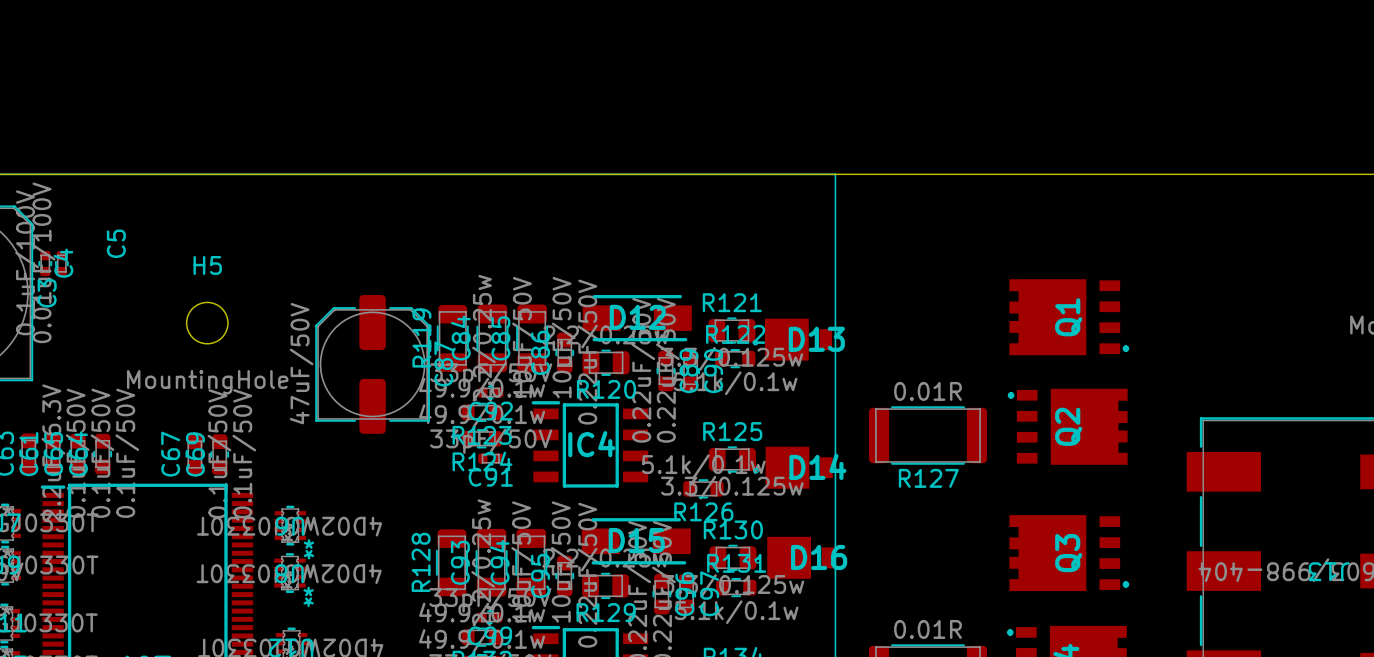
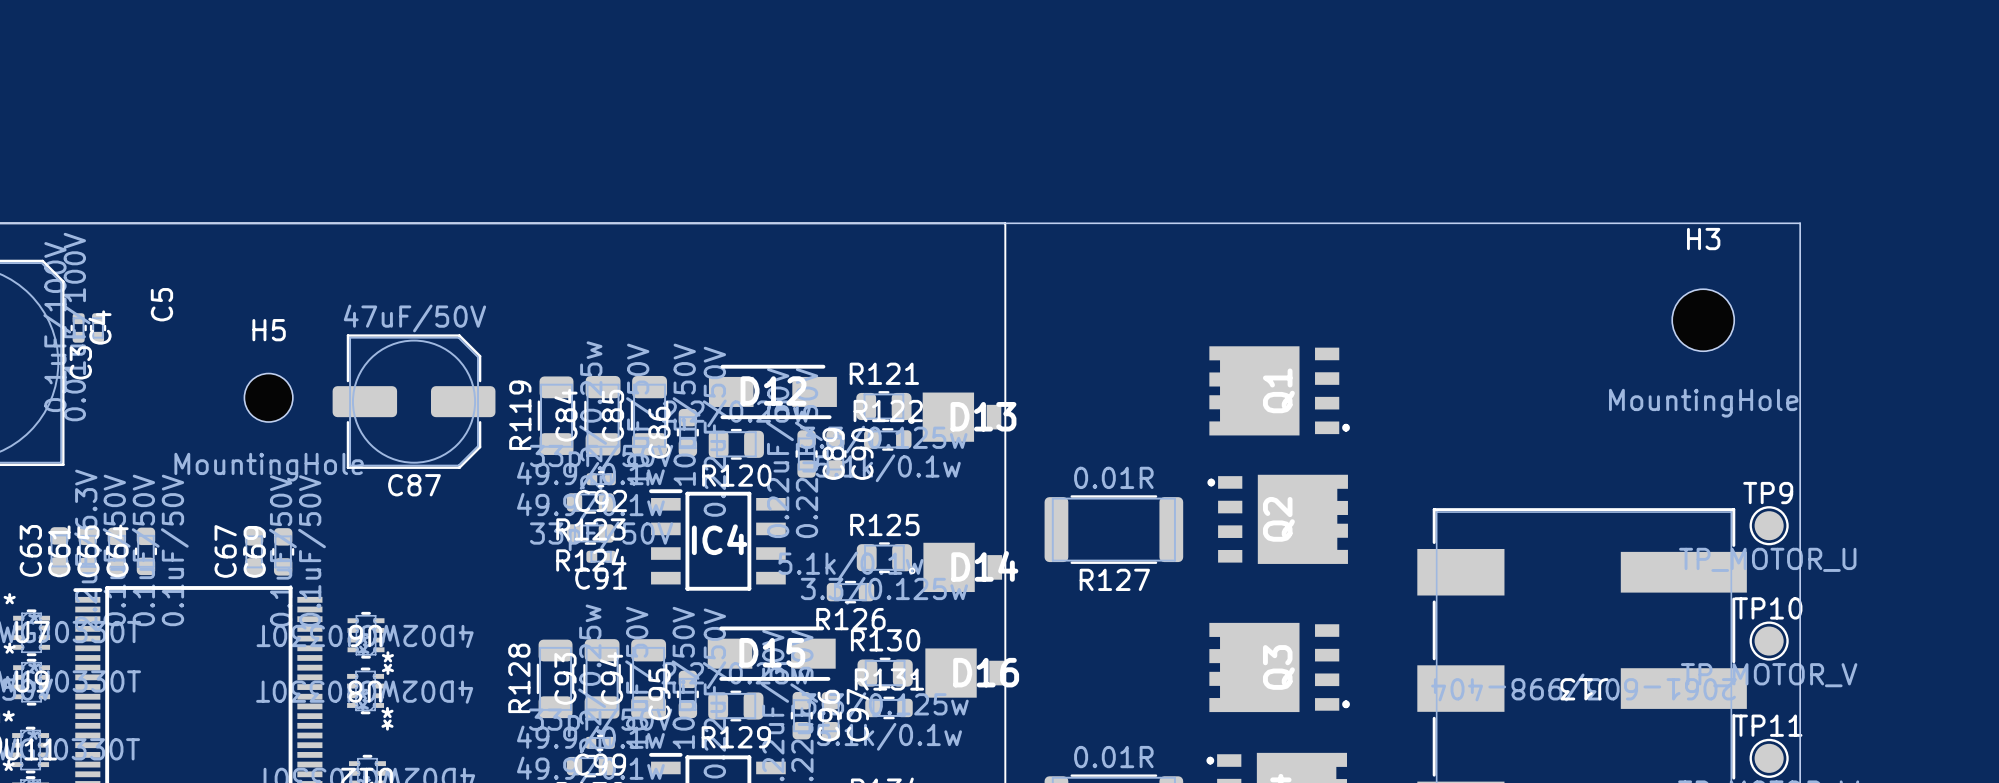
C87 rotation: 0° (372, 364) -> 90° clockwise (414, 401)

